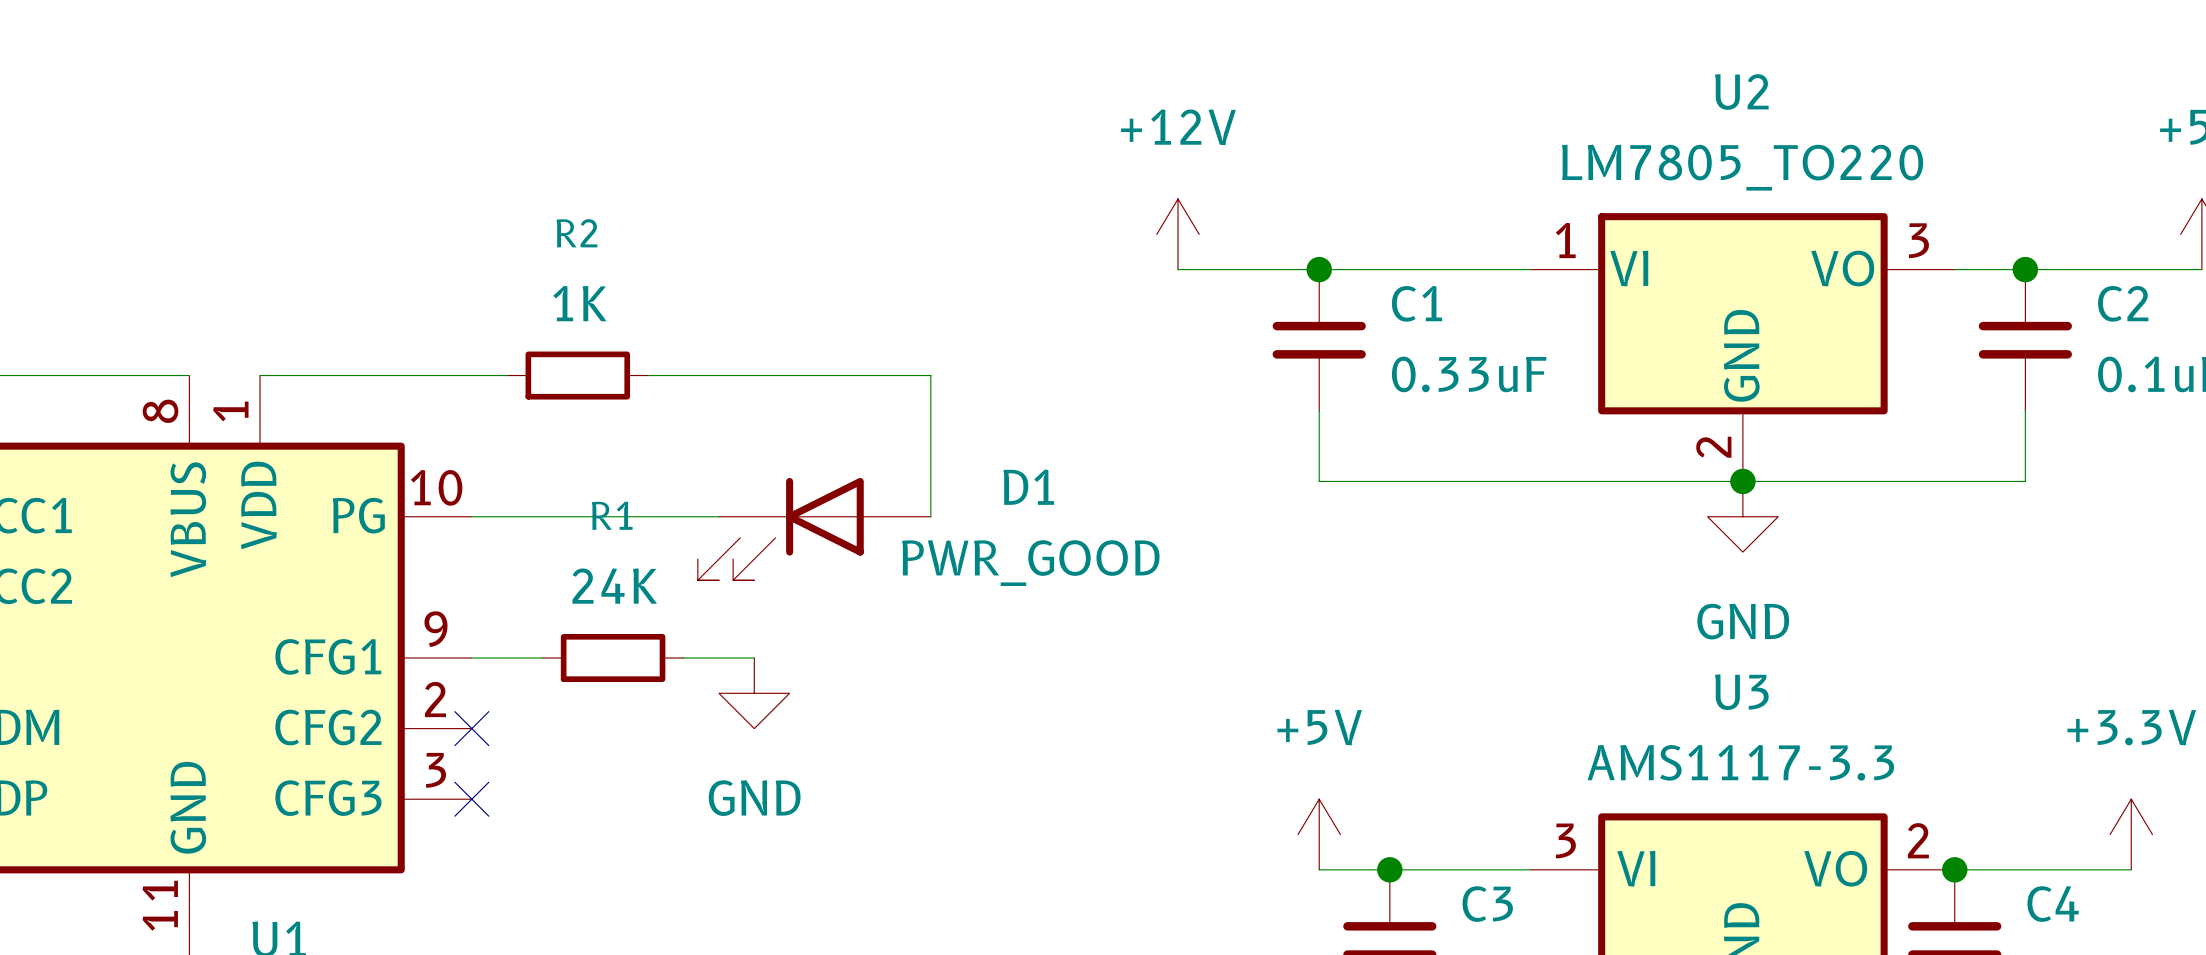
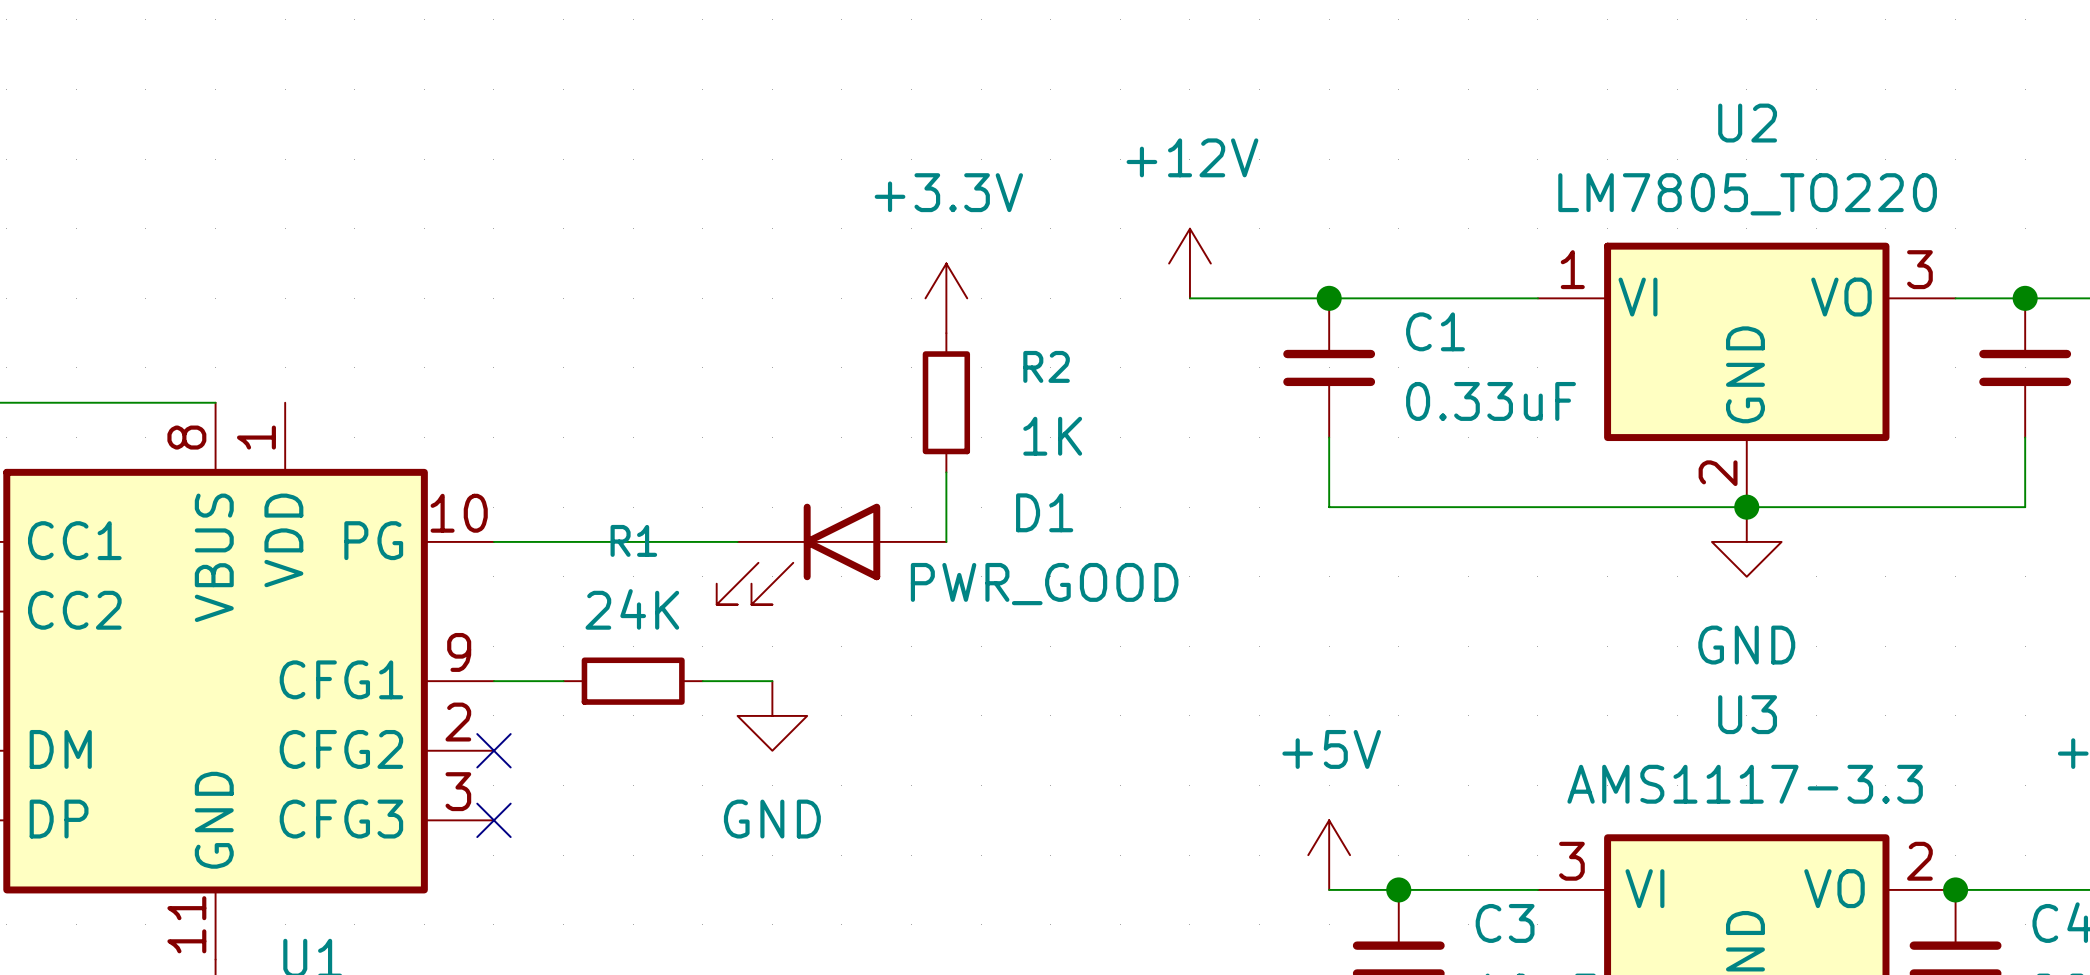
power symbol: none -> +3.3V (946, 298)
R2 value position: 1K (579, 303) -> 1K (1052, 436)
wire: (260, 375) (507, 375) -> none
R2 rotation: 0° (577, 375) -> 90° clockwise (946, 402)
R2 position: (577, 375) -> (946, 402)
wire: (648, 375) (930, 375) (930, 446) -> none

